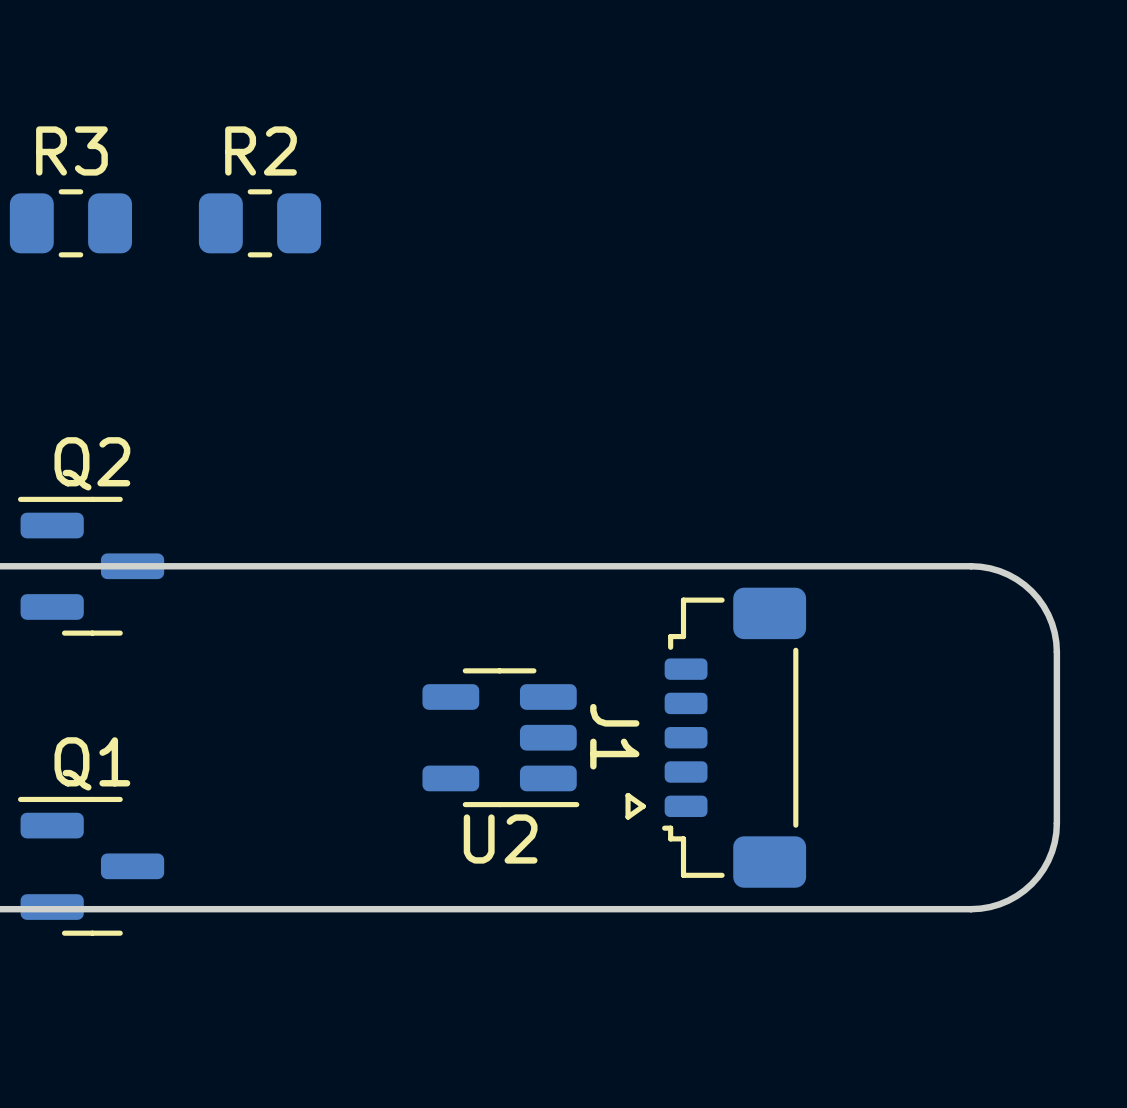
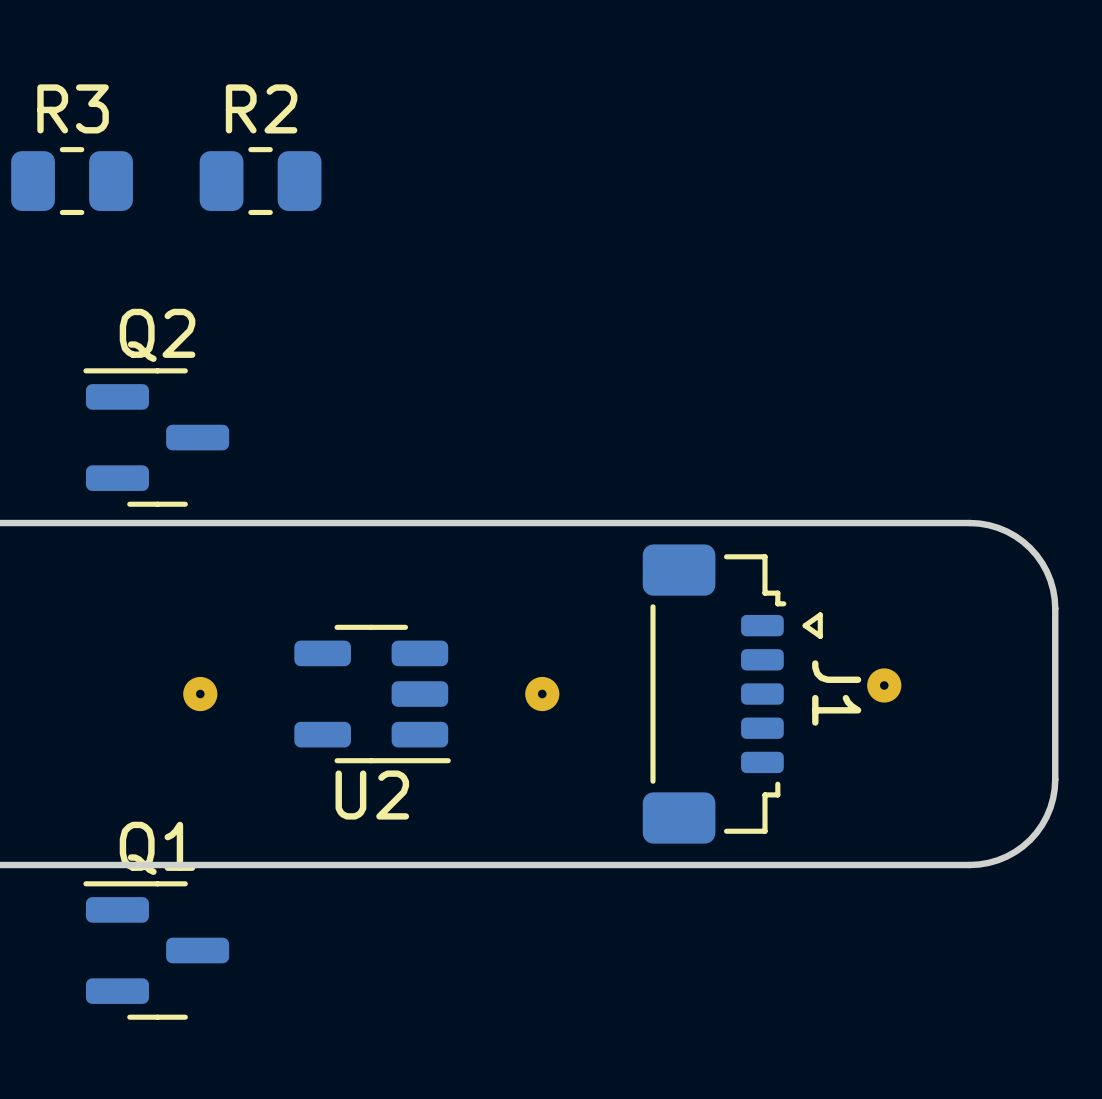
Q2 position: (91, 566) -> (156, 437)
part: none -> (884, 685)
part: none -> (200, 694)
U2 position: (500, 737) -> (372, 694)
part: none -> (542, 694)
J1 rotation: 0° (715, 737) -> 180° (732, 694)
Q1 position: (91, 866) -> (156, 950)

